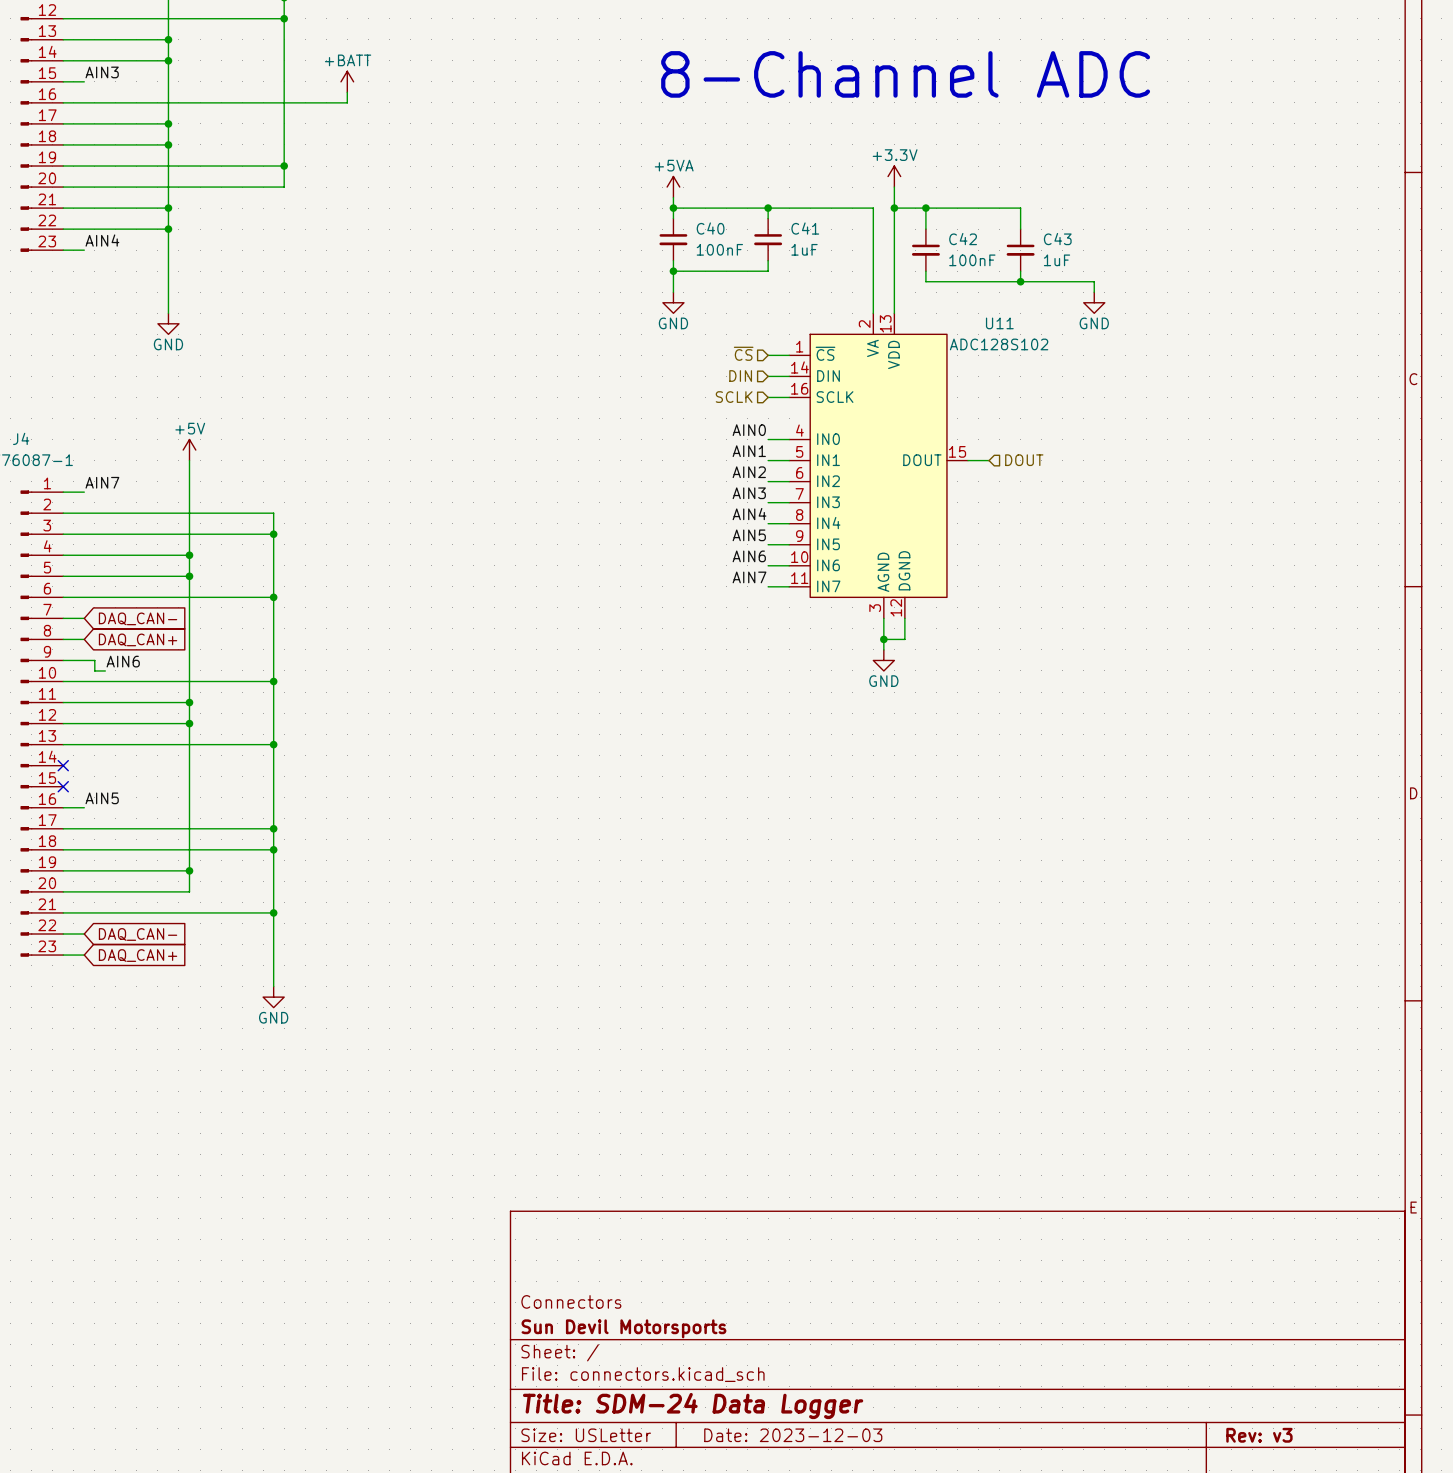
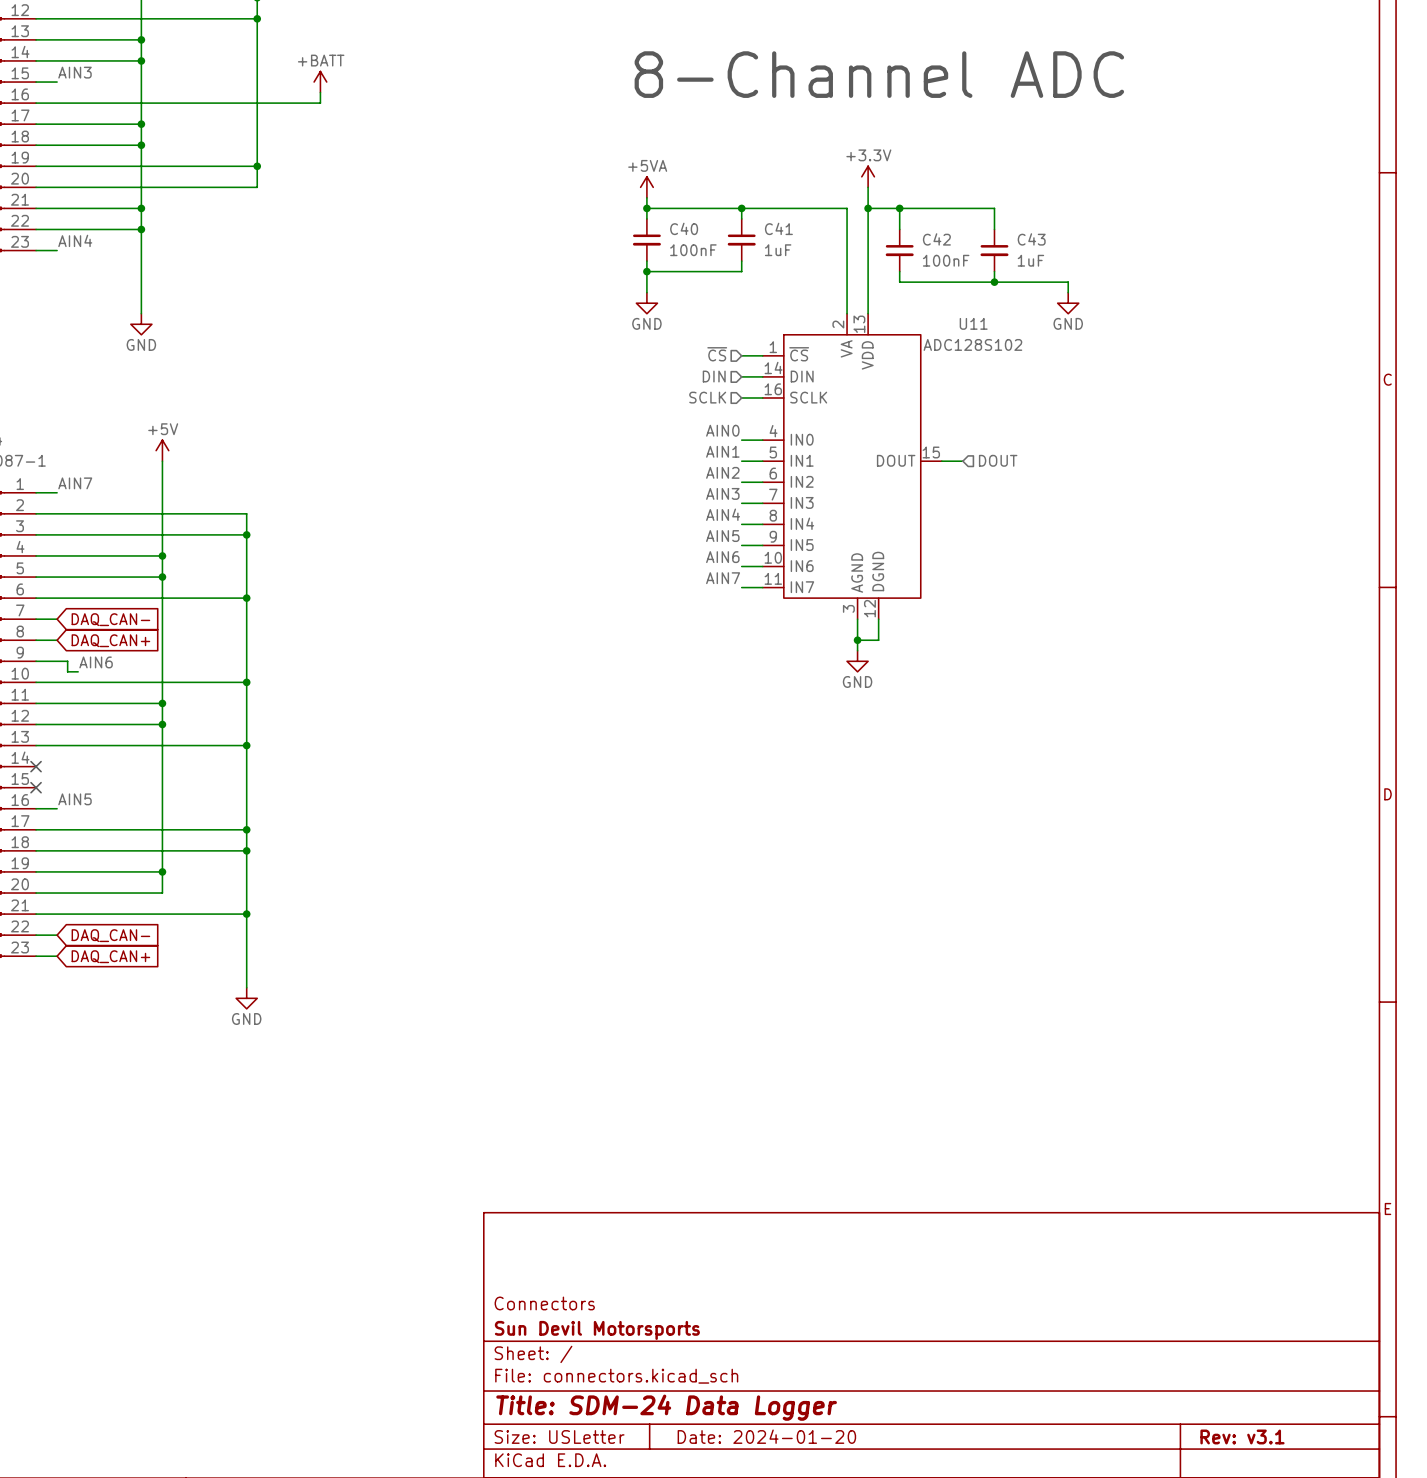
title block: Date: 2023-12-03 (793, 1435) -> Date: 2024-01-20 (766, 1436)
title block: Rev: v3 (1259, 1435) -> Rev: v3.1 (1242, 1436)

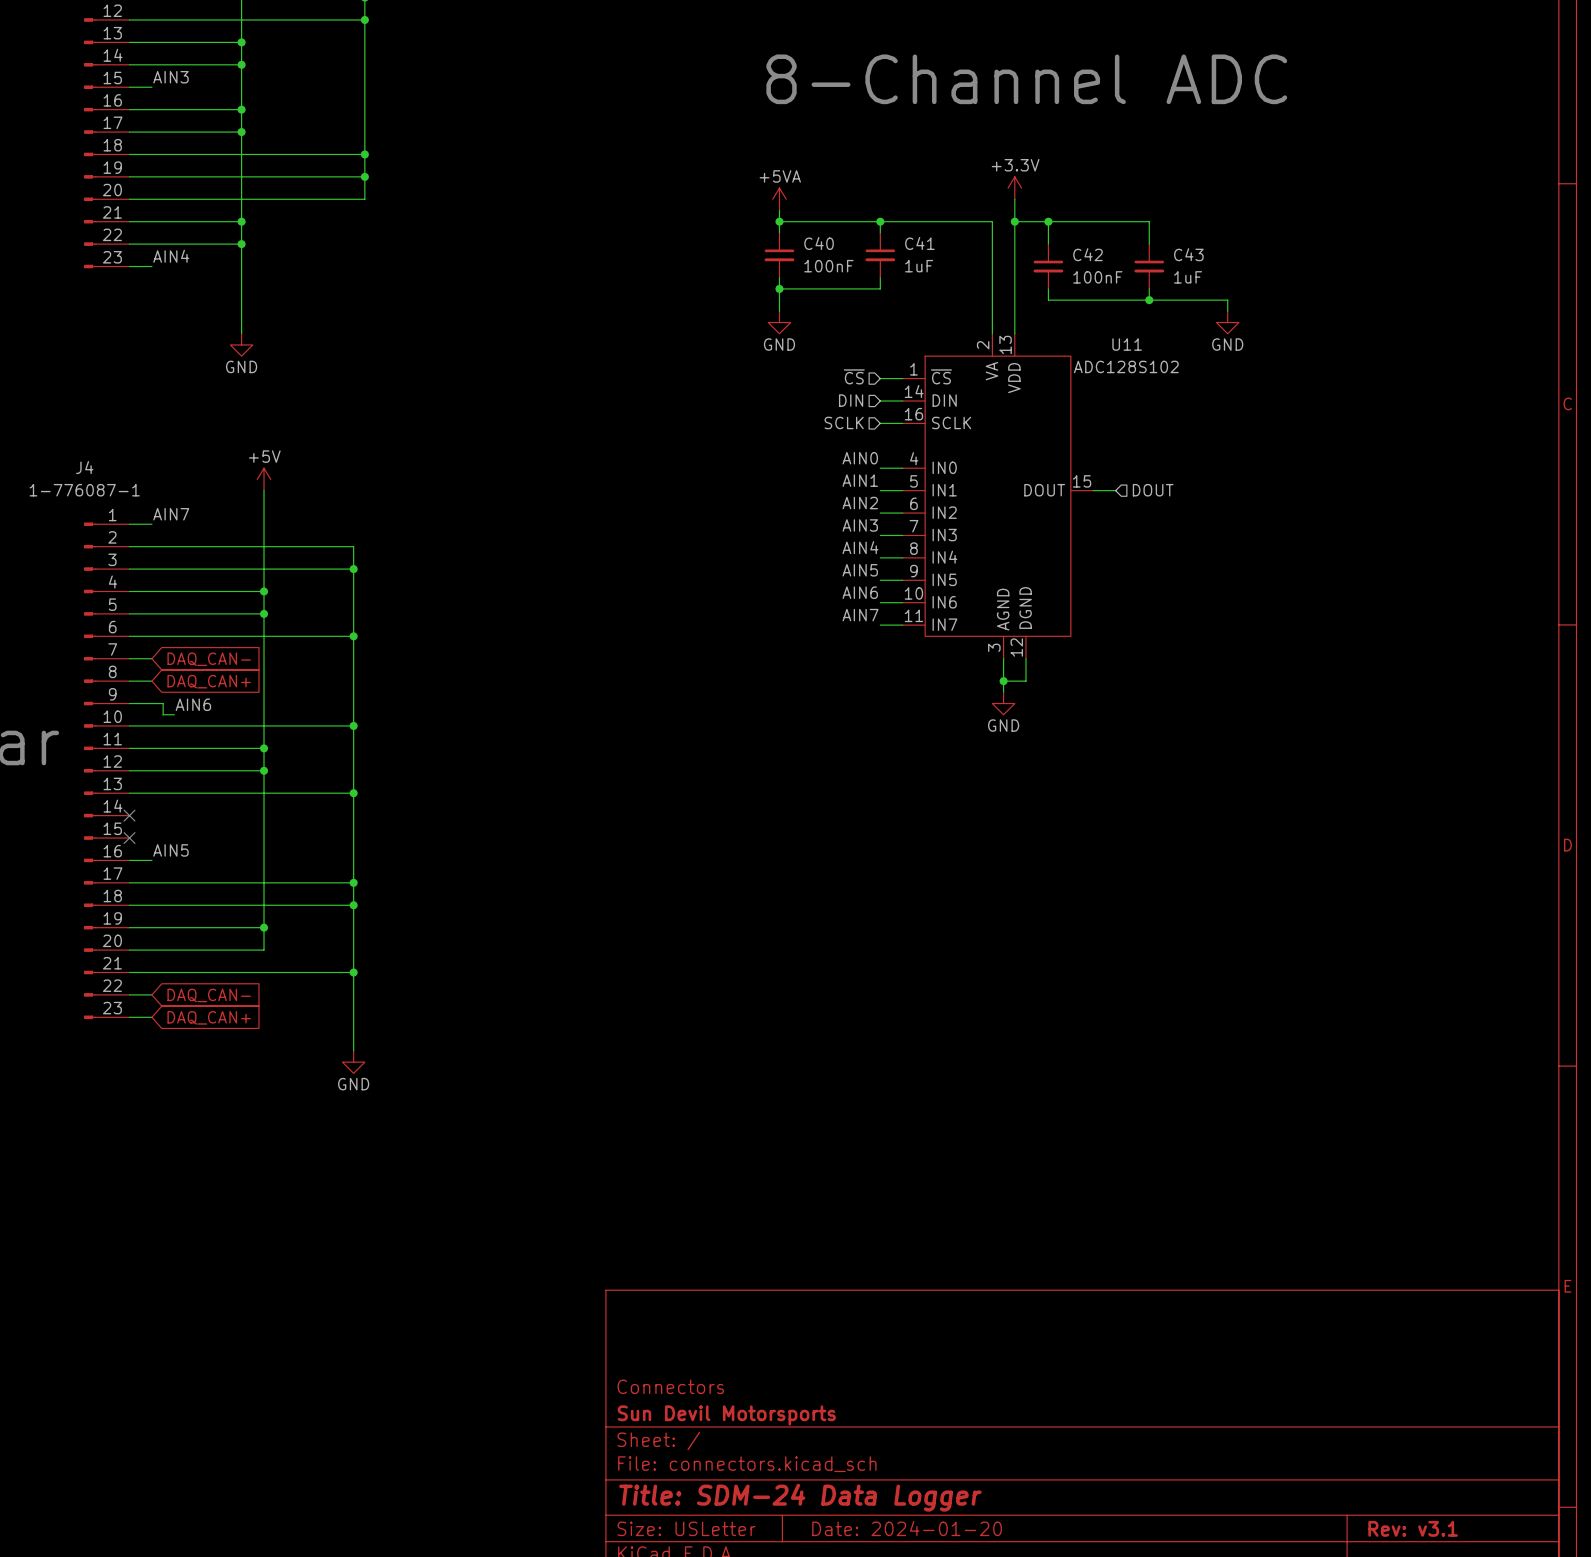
power symbol: +BATT (320, 82) -> none
wire: (320, 92) (320, 103) (141, 103) -> none
wire: none -> (241, 154) (364, 154)
junction position: (141, 145) -> (241, 109)
junction: none -> (364, 154)

